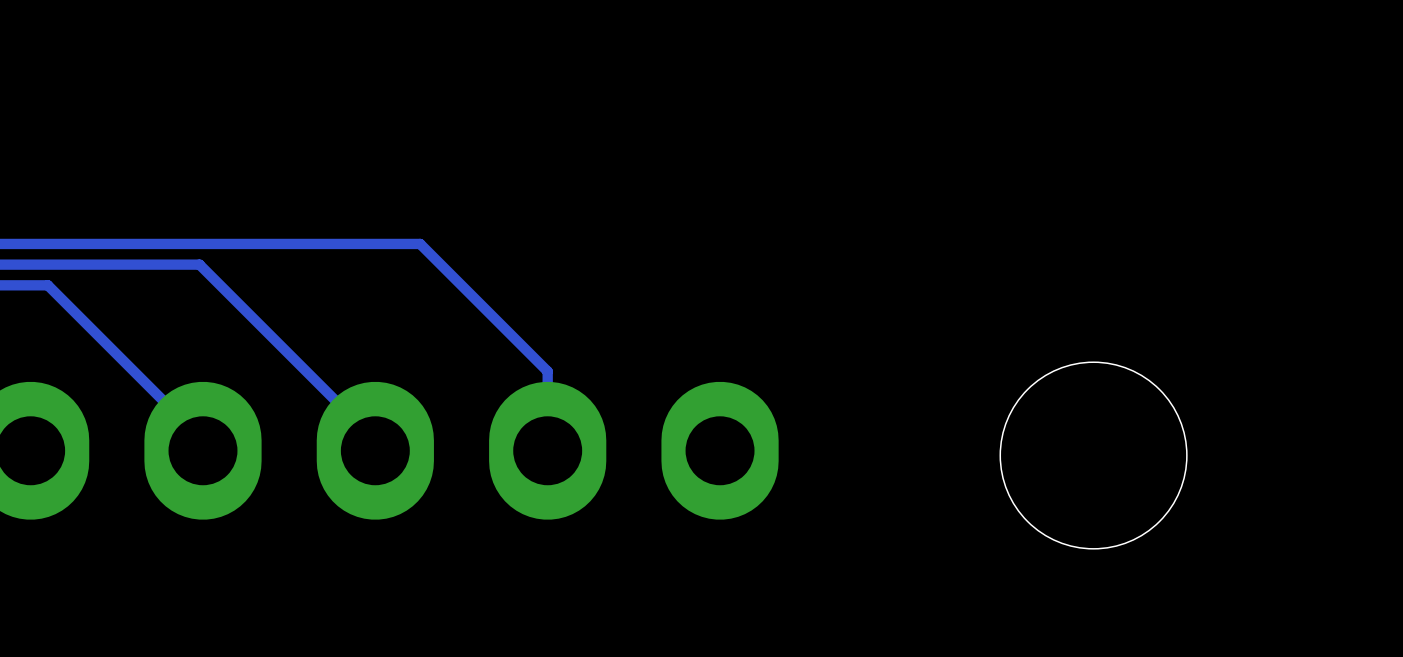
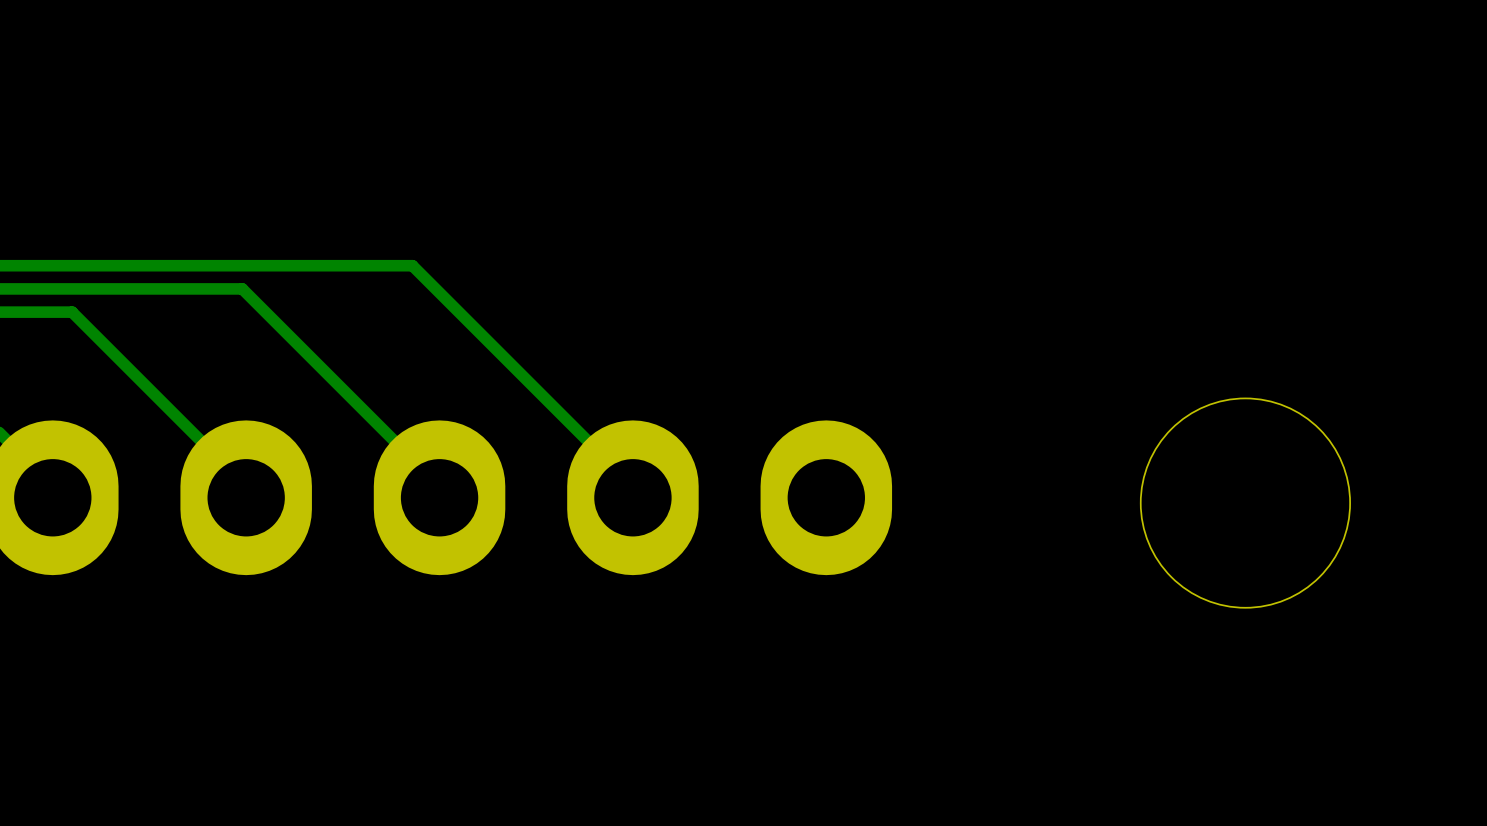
track: (351, 243) (420, 243) (547, 371) (547, 450) -> (412, 265) (632, 486) (632, 497)

